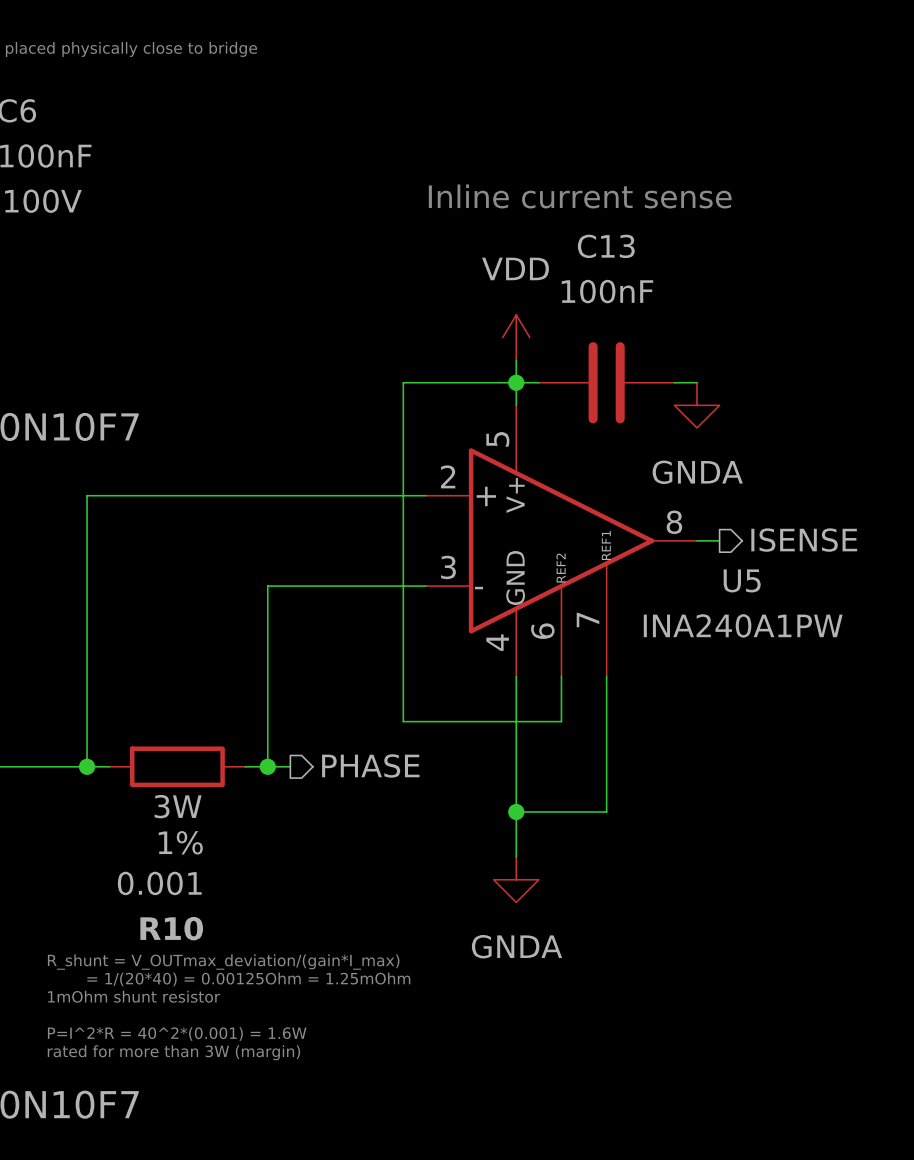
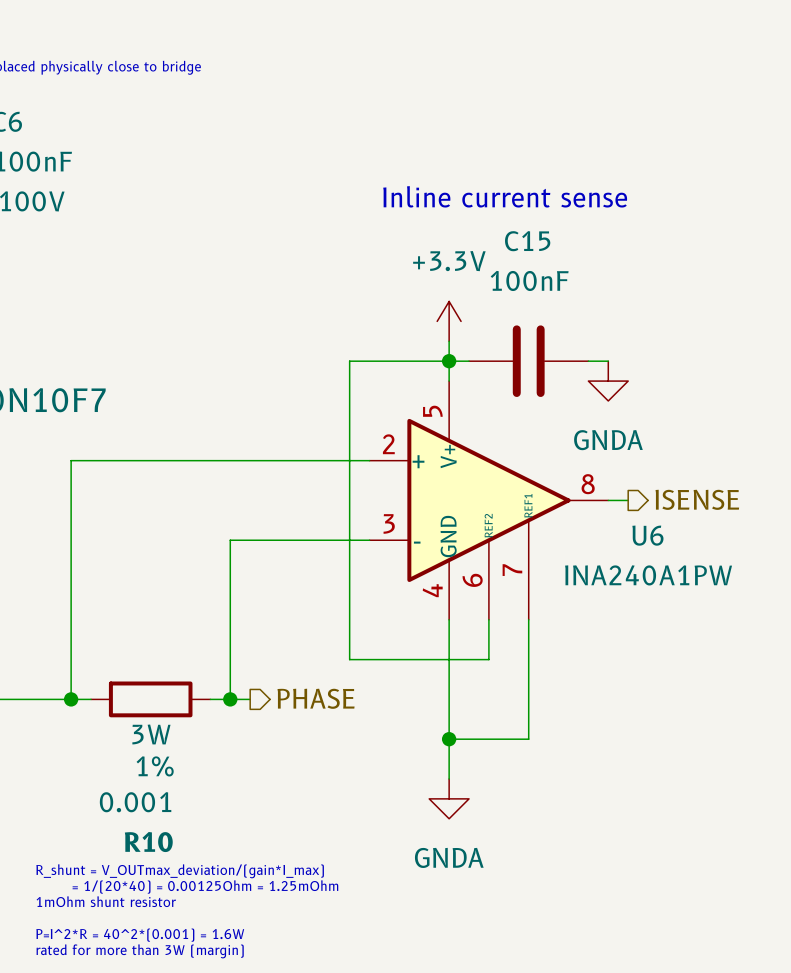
C13 name: C13 (606, 246) -> C15 (527, 241)
power symbol: VDD (516, 337) -> +3.3V (449, 321)
U5 name: U5 (742, 580) -> U6 (647, 535)

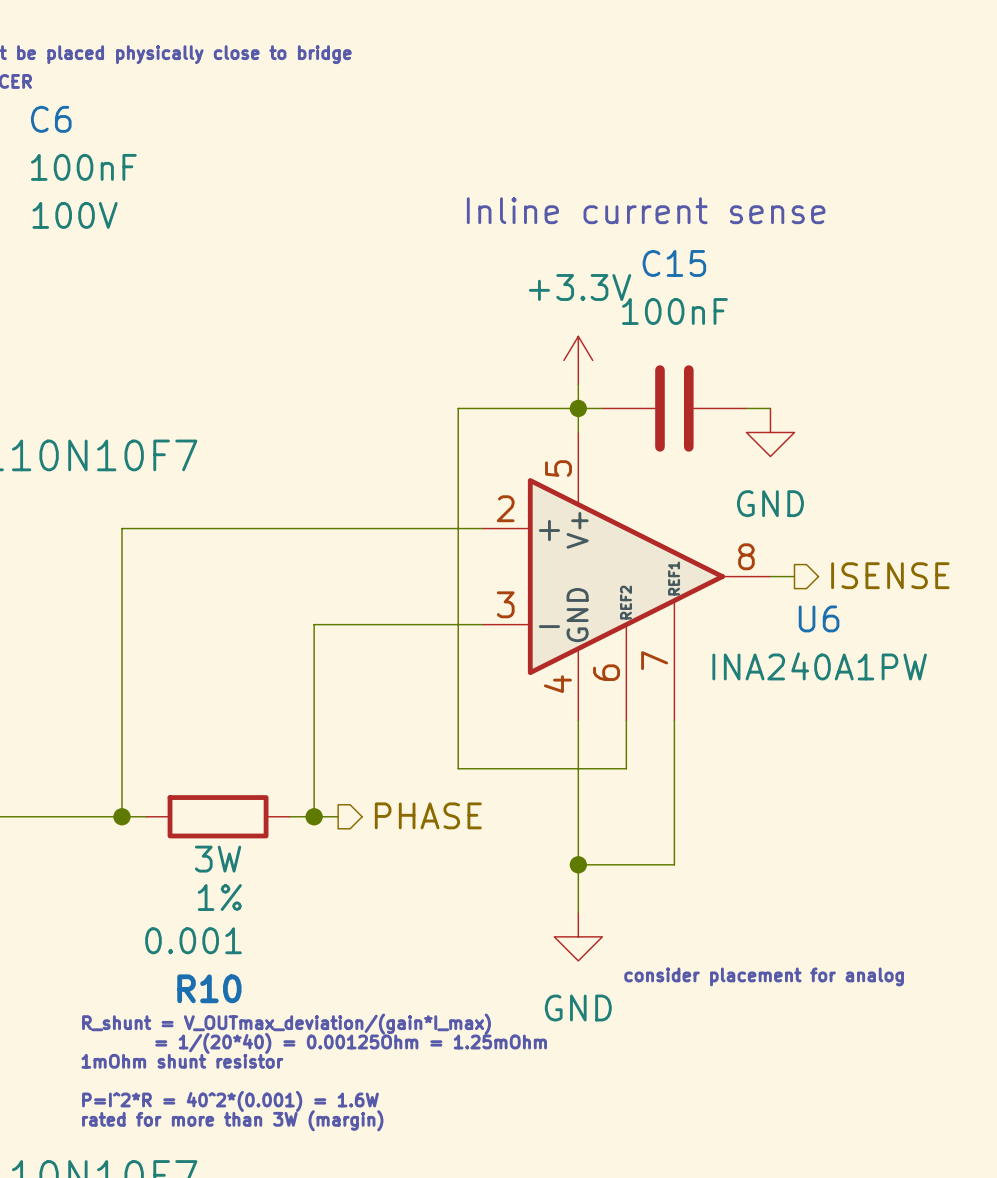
power symbol: GNDA (608, 381) -> GND (770, 432)
power symbol: GNDA (449, 798) -> GND (578, 936)
text: none -> consider placement for analog (764, 976)

